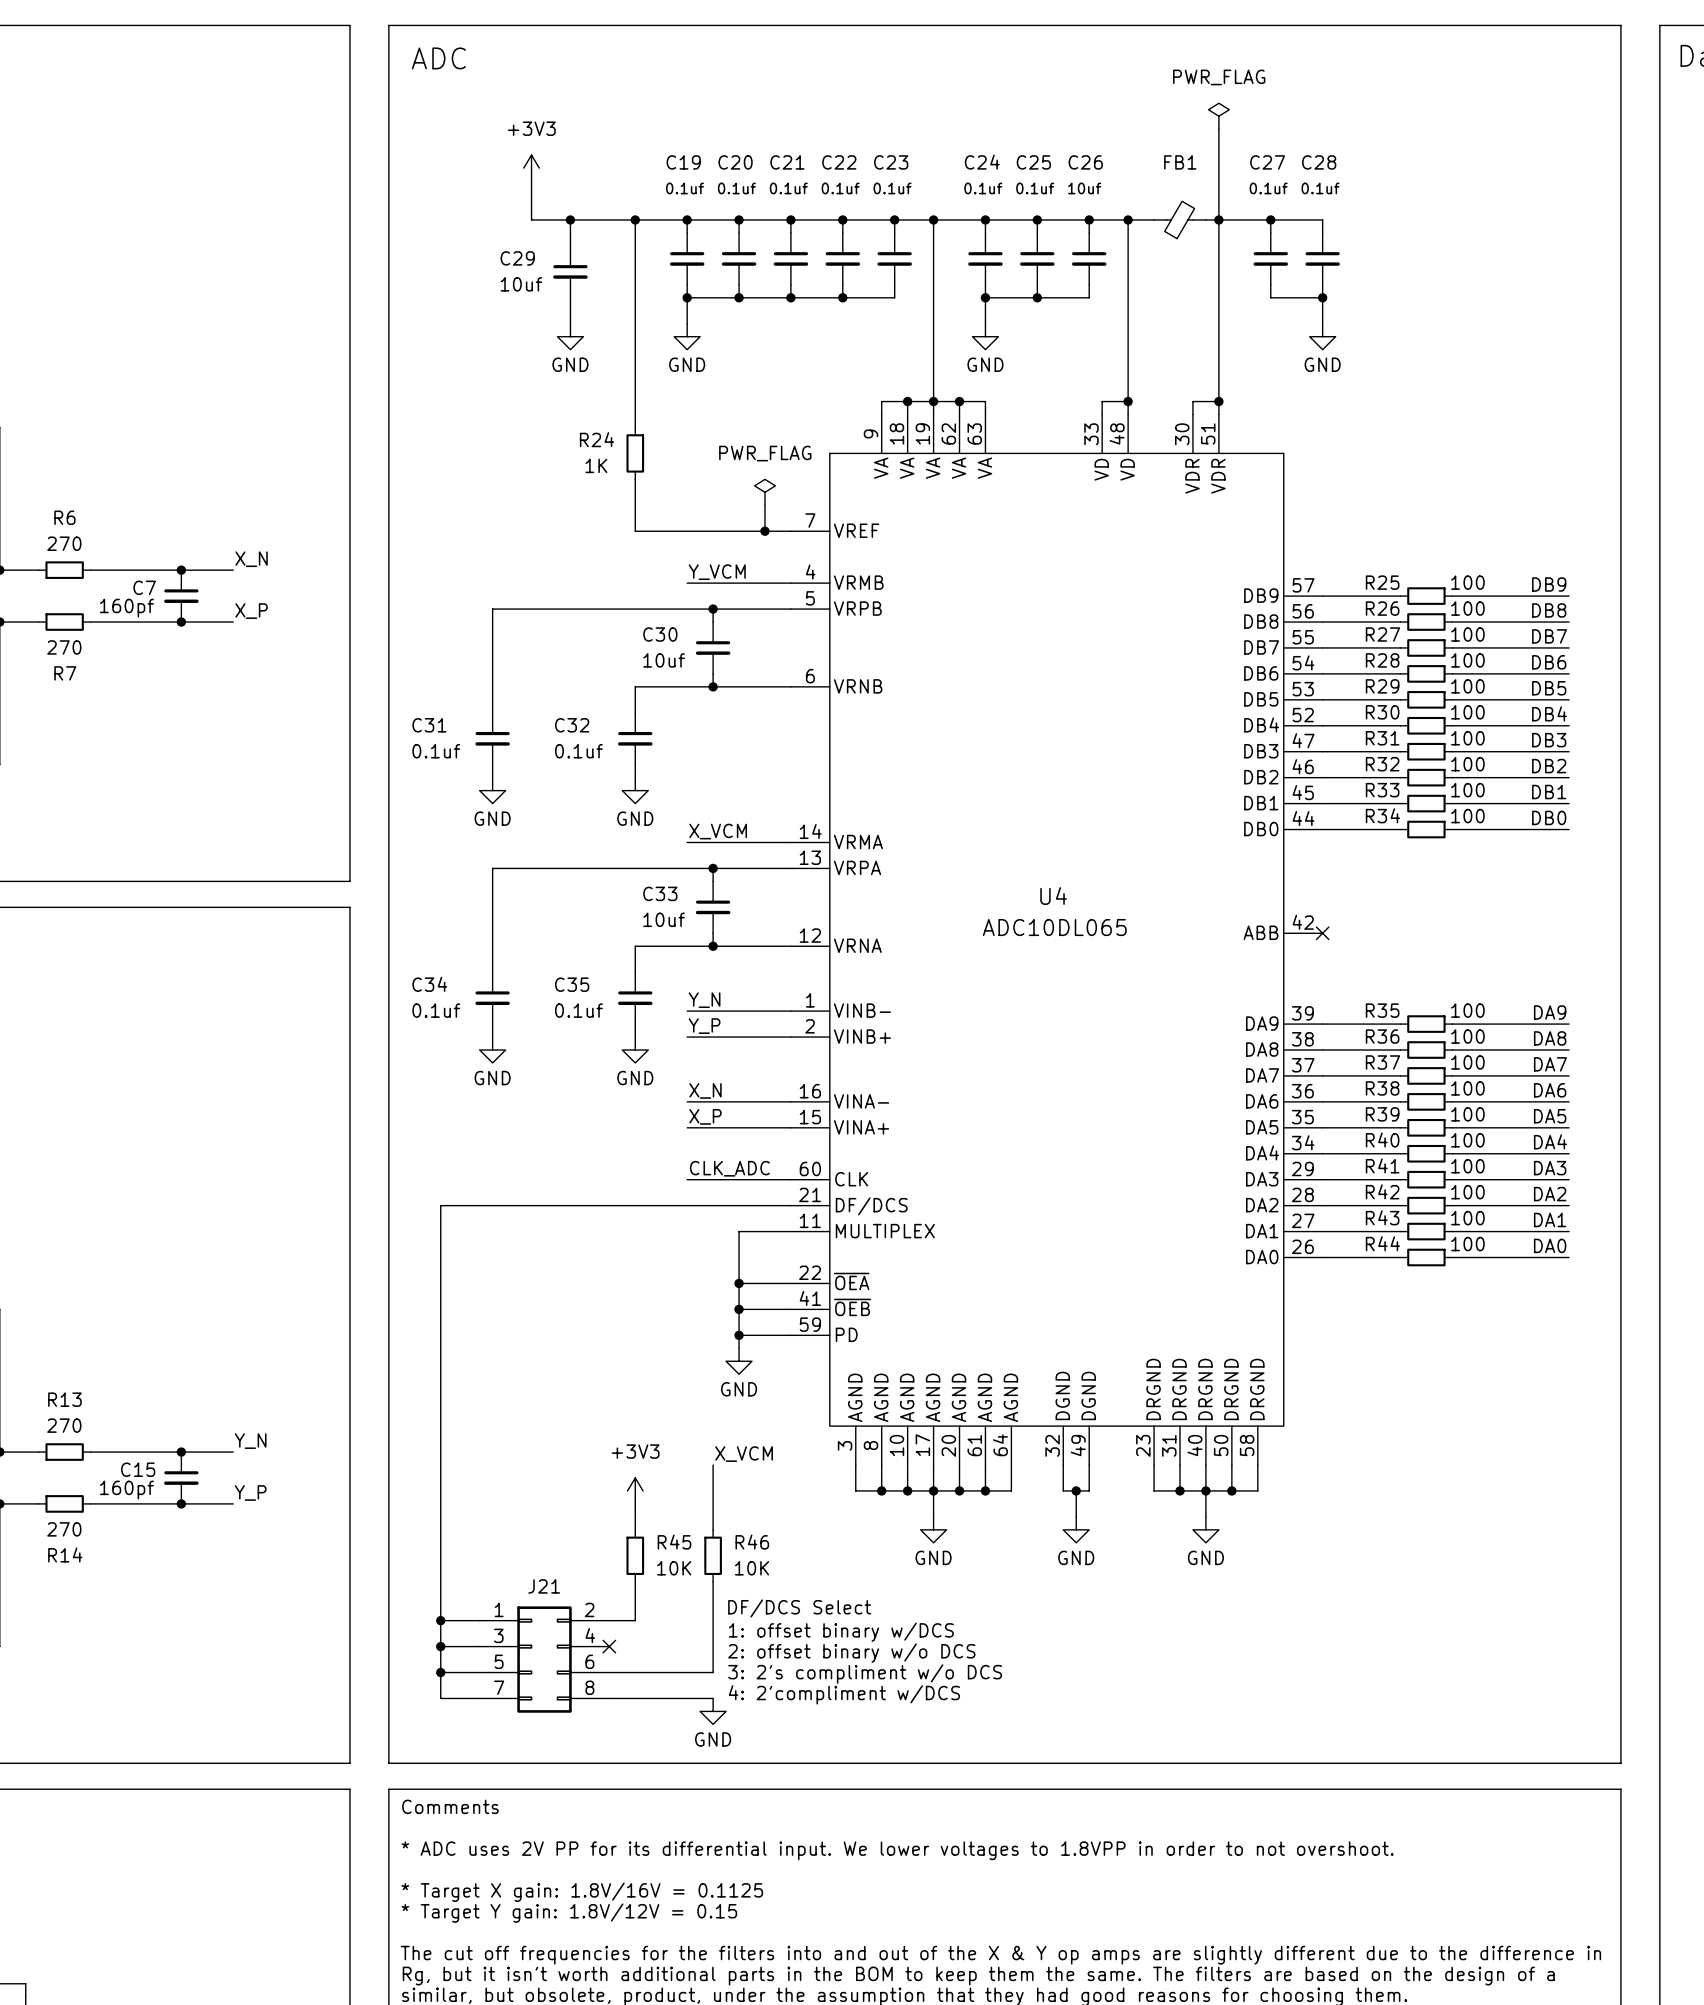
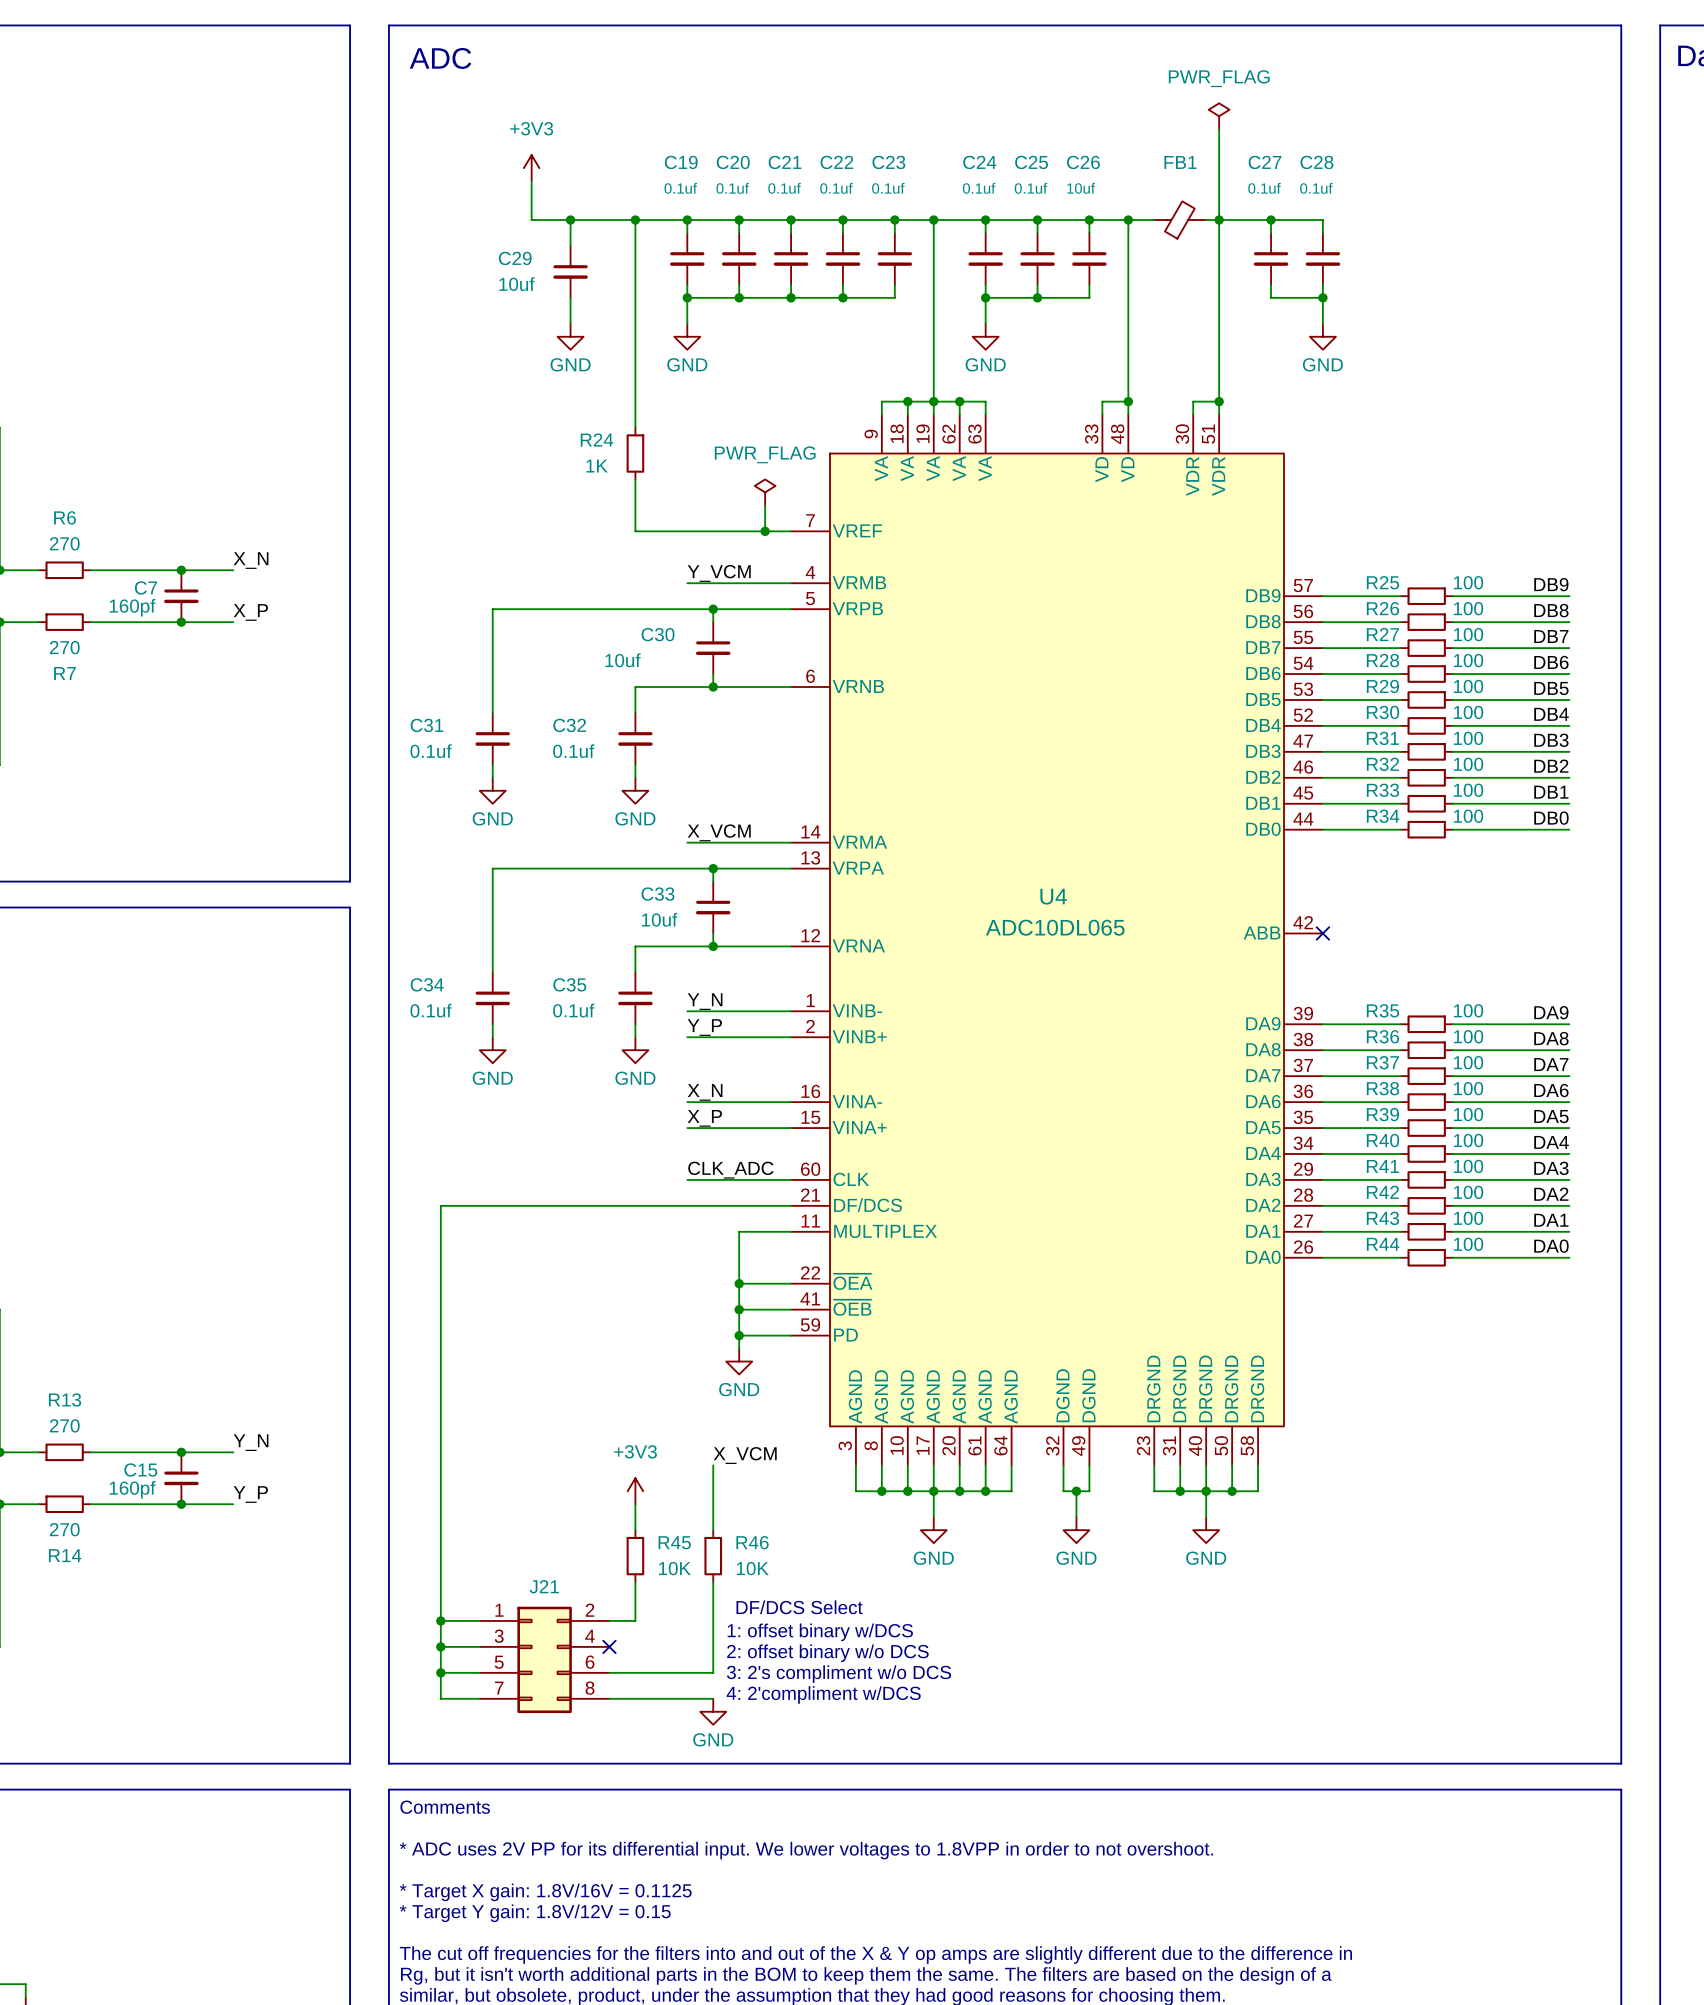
C30 value position: 10uf (664, 660) -> 10uf (622, 660)

